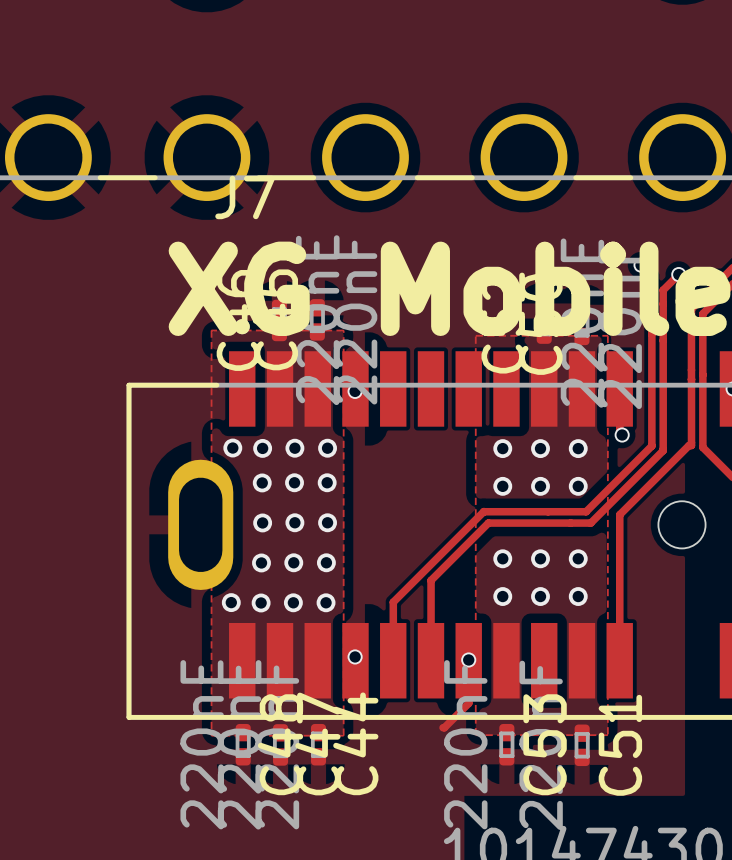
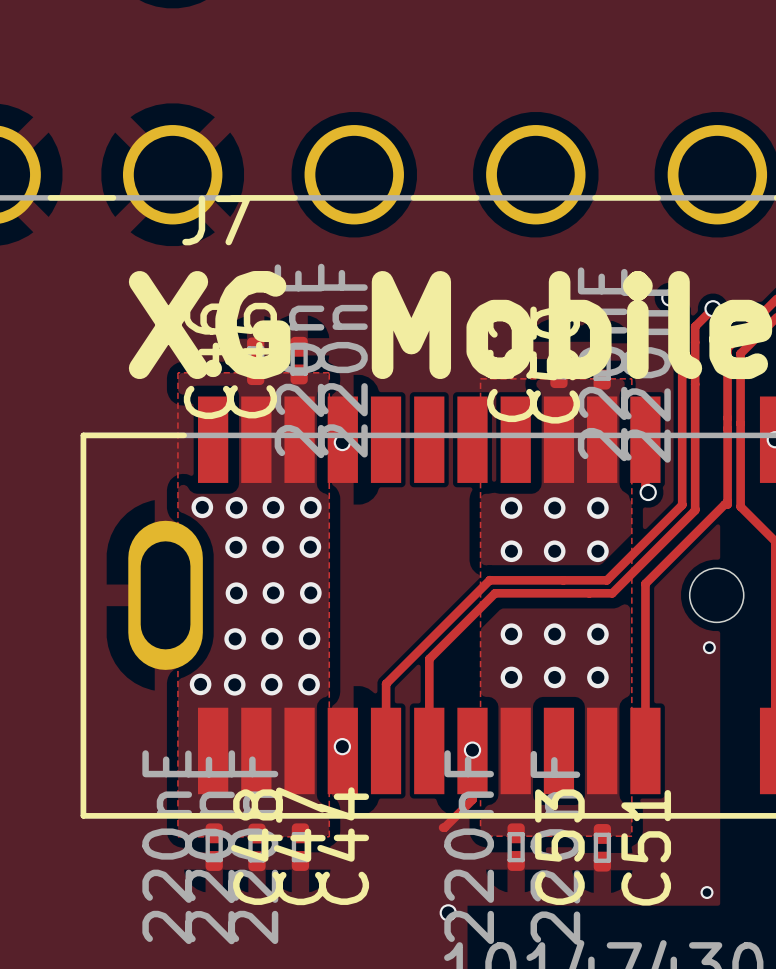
via: none -> (709, 647)
via: none -> (707, 892)
via: none -> (448, 912)

